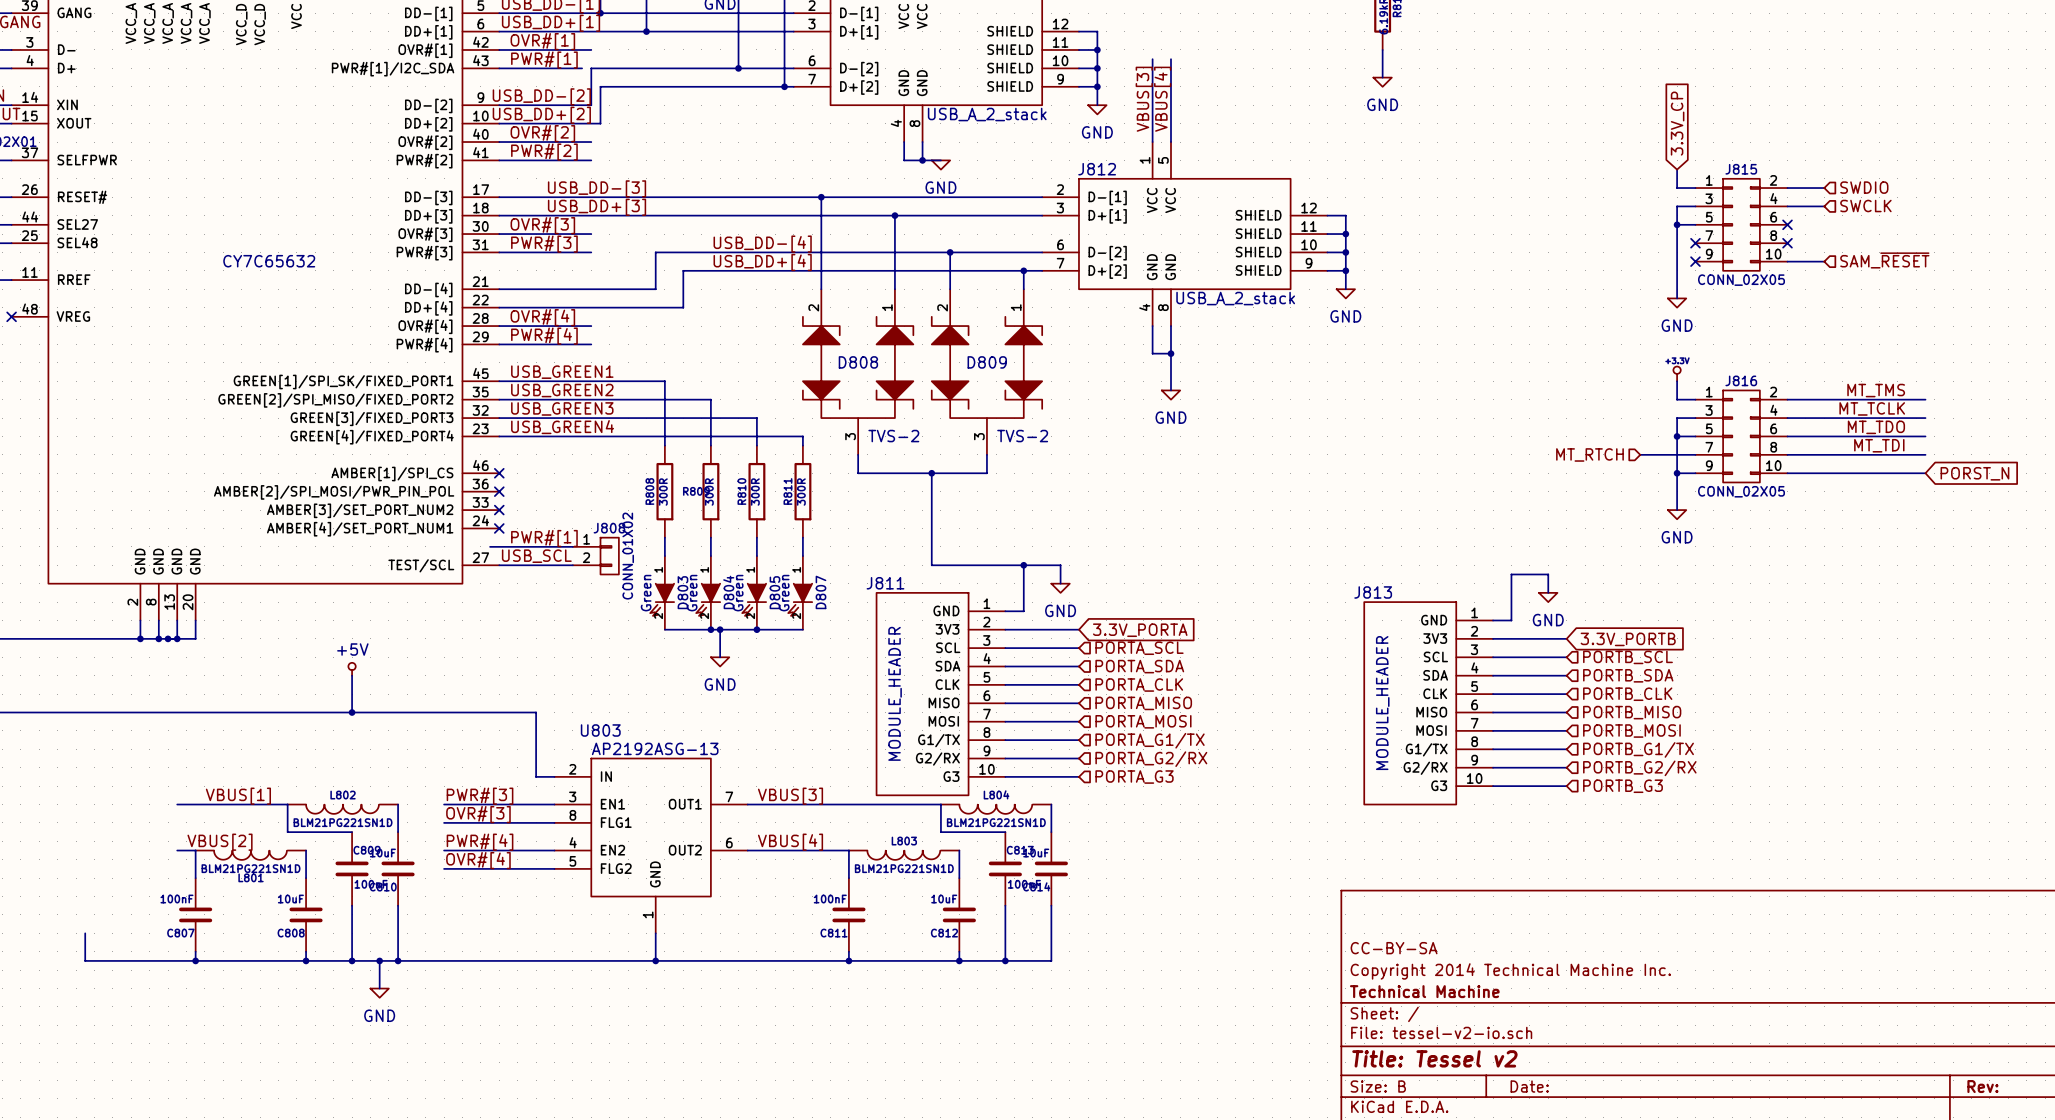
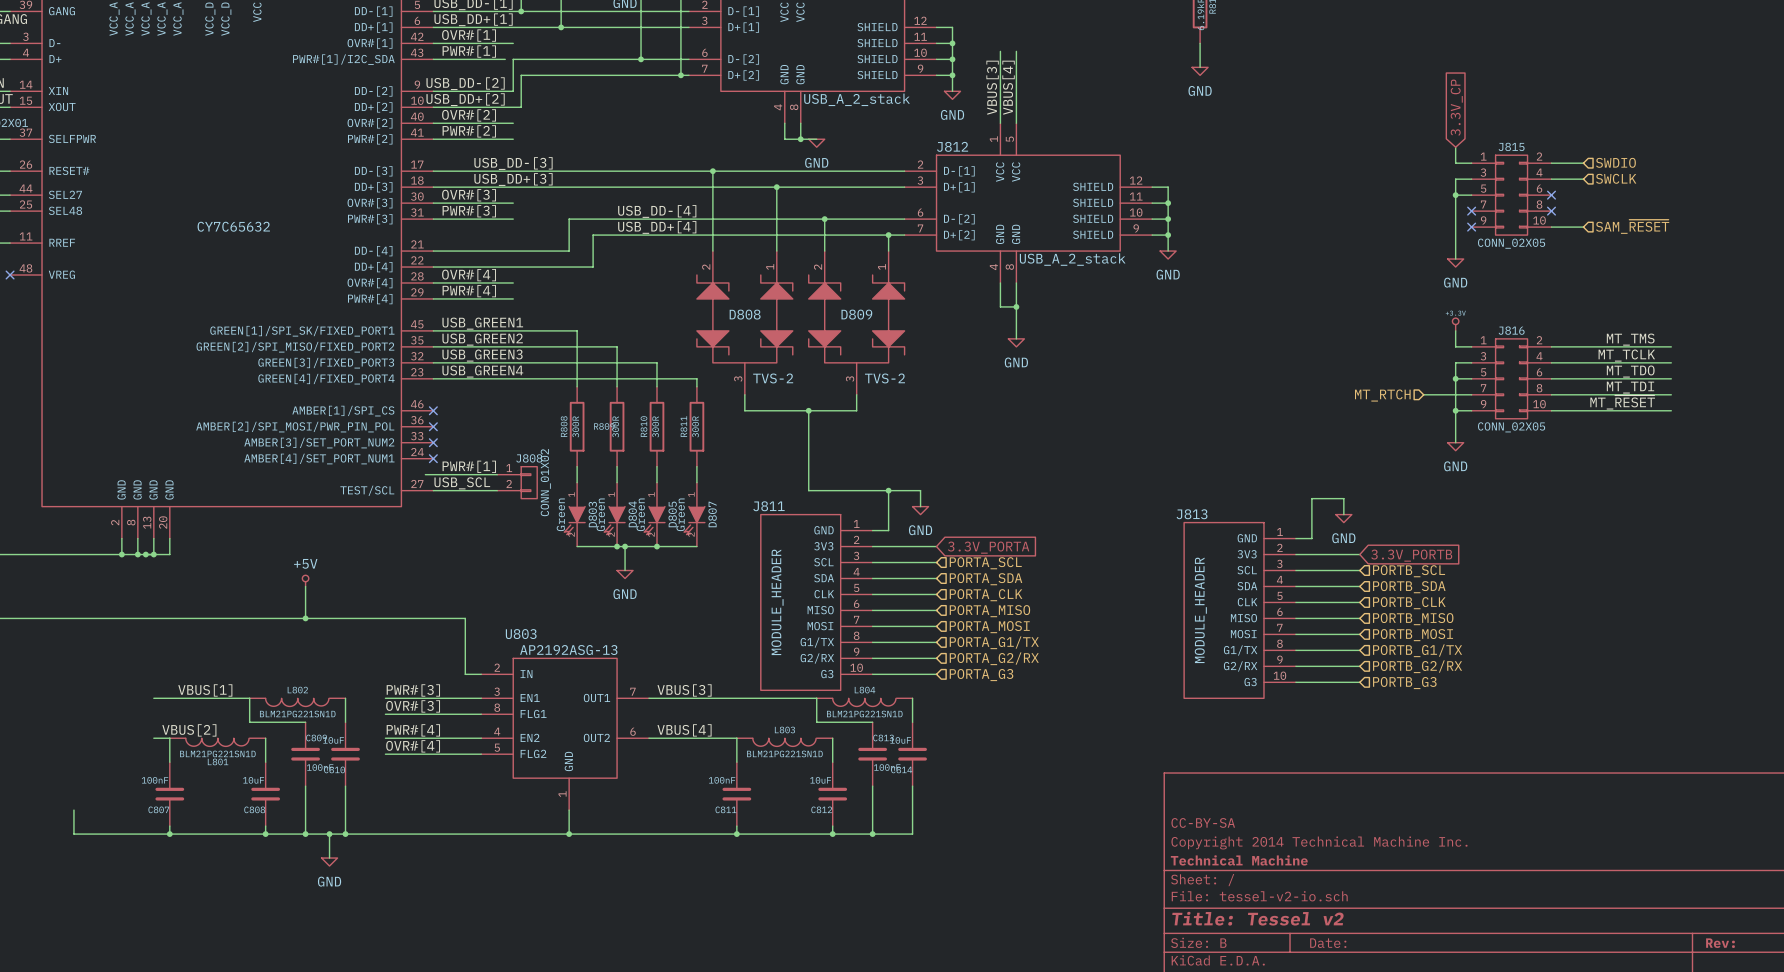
label: none -> MT_~{RESET} (1622, 402)
global label: PORST_N (1974, 473) -> none

